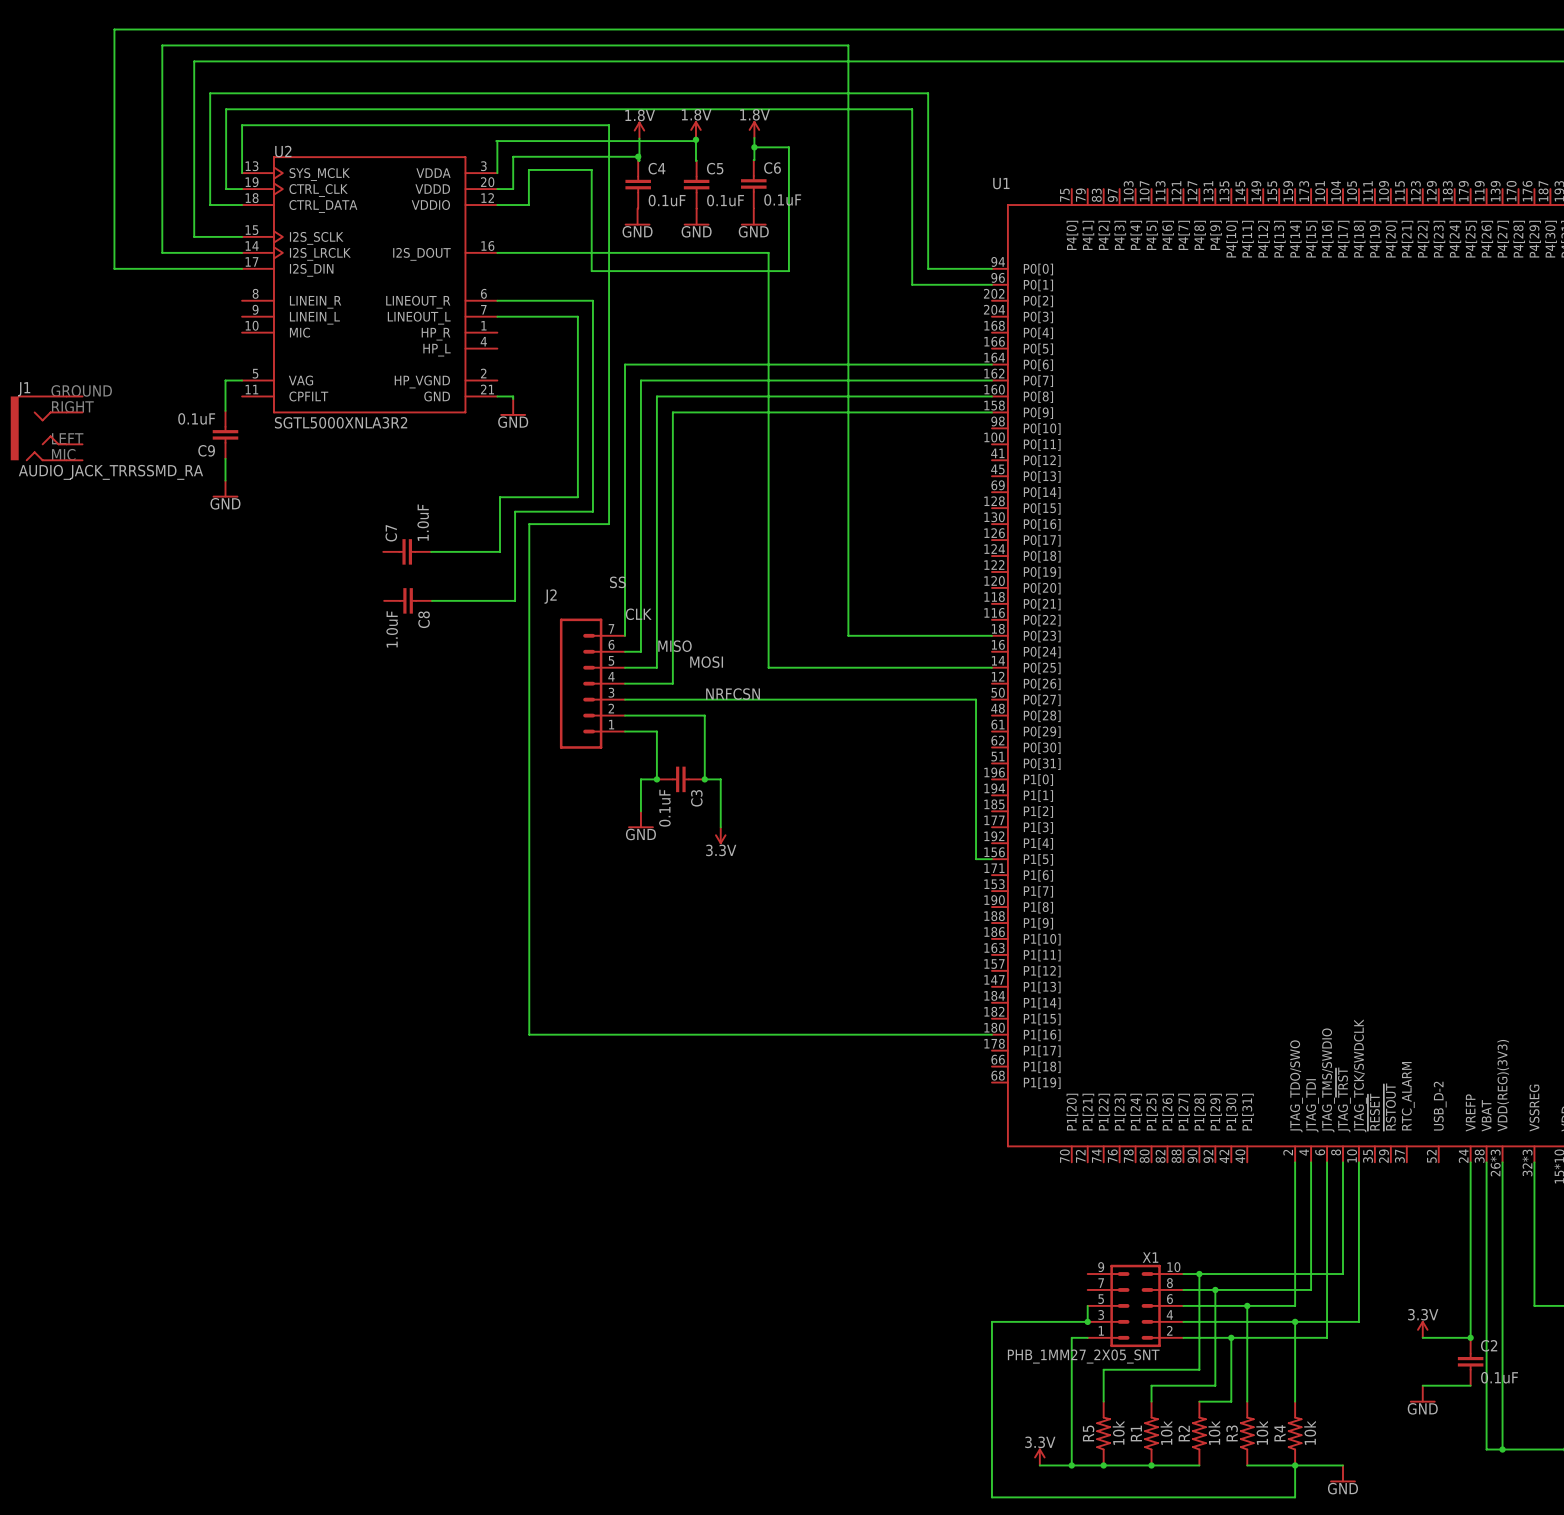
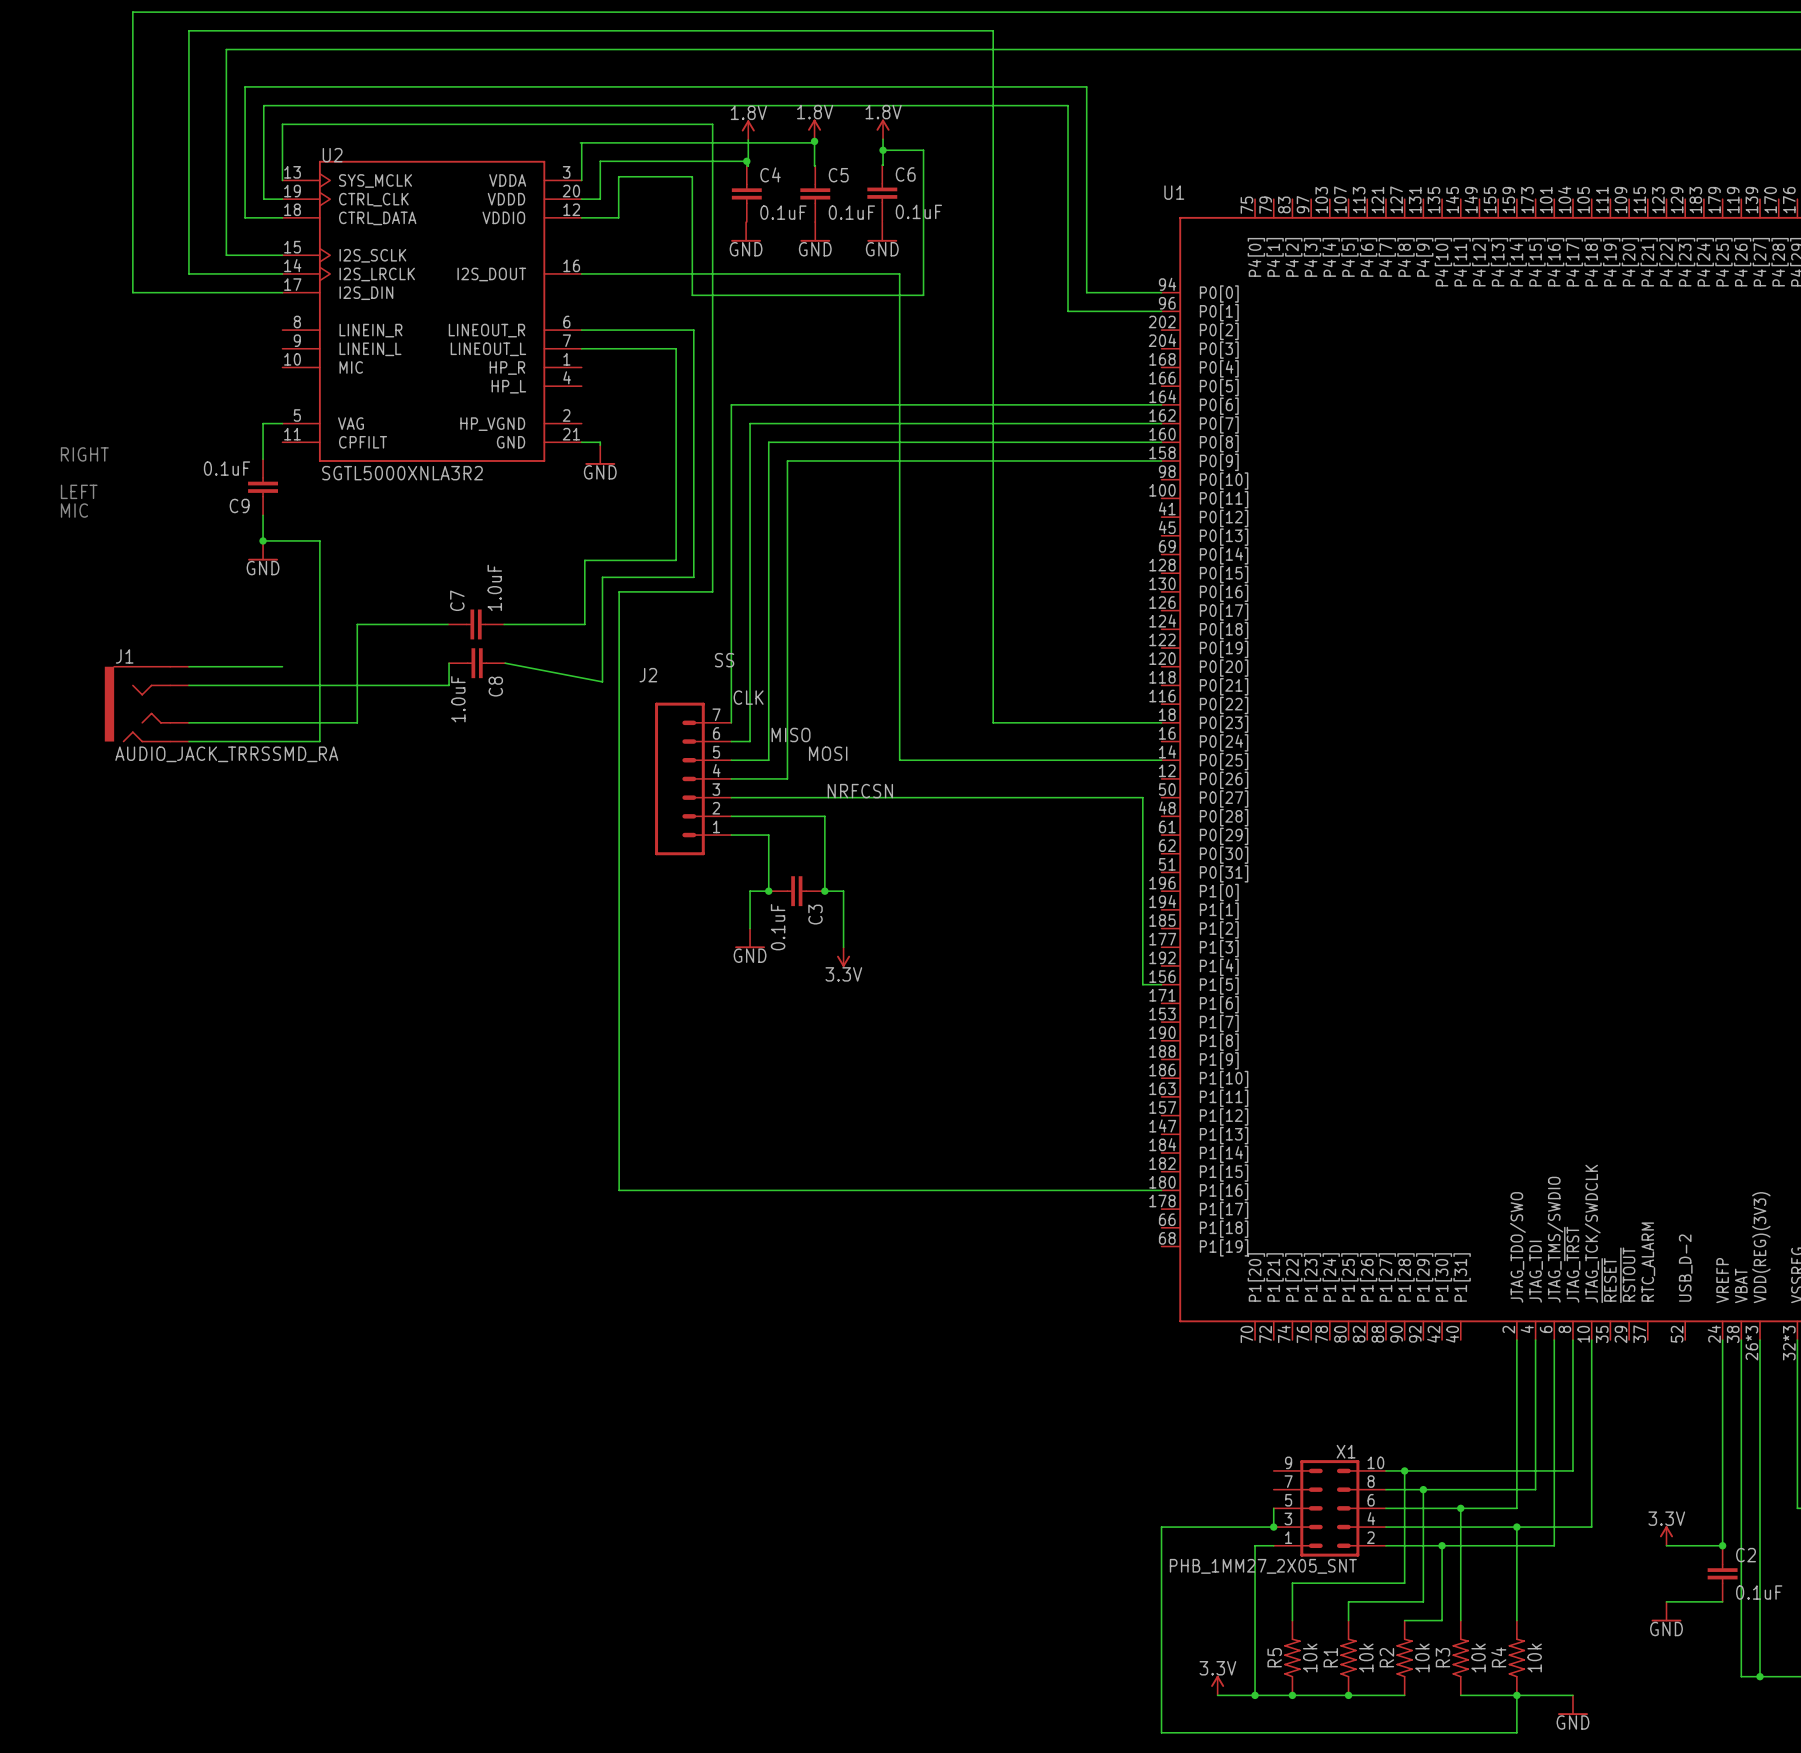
text: GROUND (81, 390) -> none
J1 position: (46, 428) -> (146, 704)
wire: none -> (263, 540) (319, 540) (319, 741) (188, 741)
junction: none -> (263, 540)
wire: none -> (448, 624) (357, 624) (357, 722) (188, 722)
wire: none -> (449, 663) (449, 685) (188, 685)
wire: none -> (188, 666) (282, 666)
C8 position: (408, 600) -> (477, 663)
wire: (432, 600) (515, 600) -> (505, 663) (602, 681)

